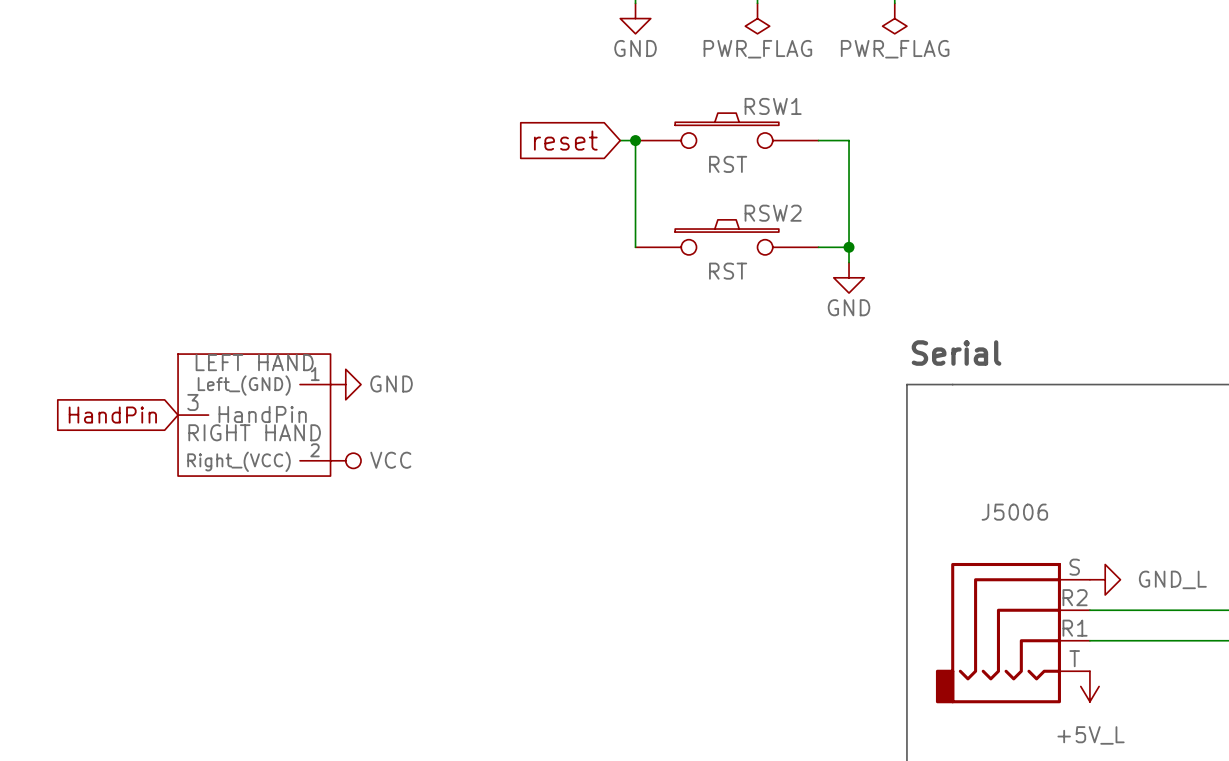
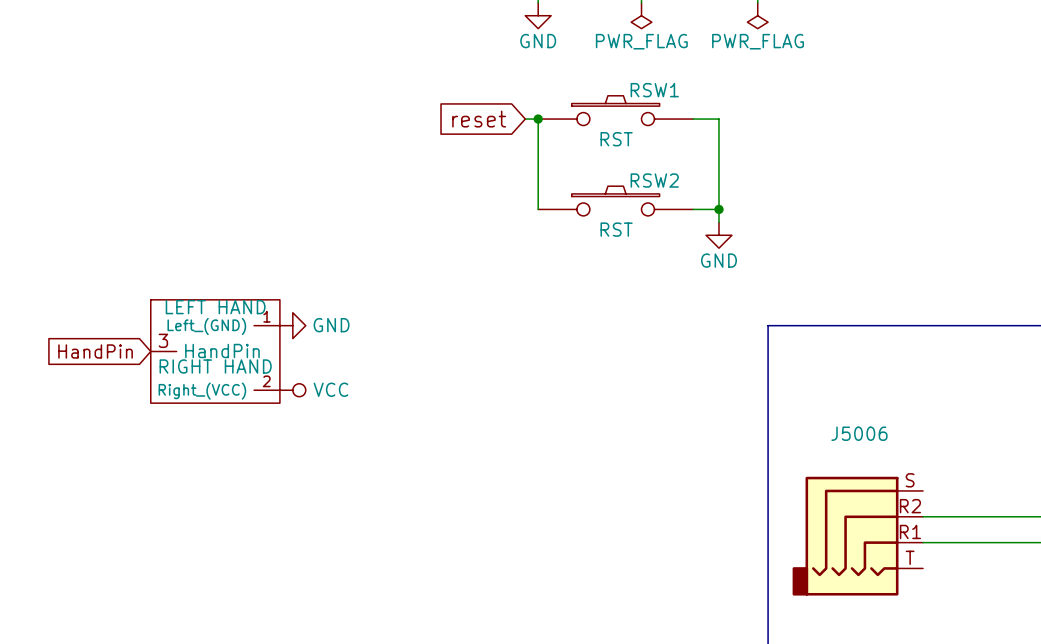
text: Serial (956, 353) -> none
power symbol: GND_L (1105, 579) -> none
power symbol: +5V_L (1089, 686) -> none

